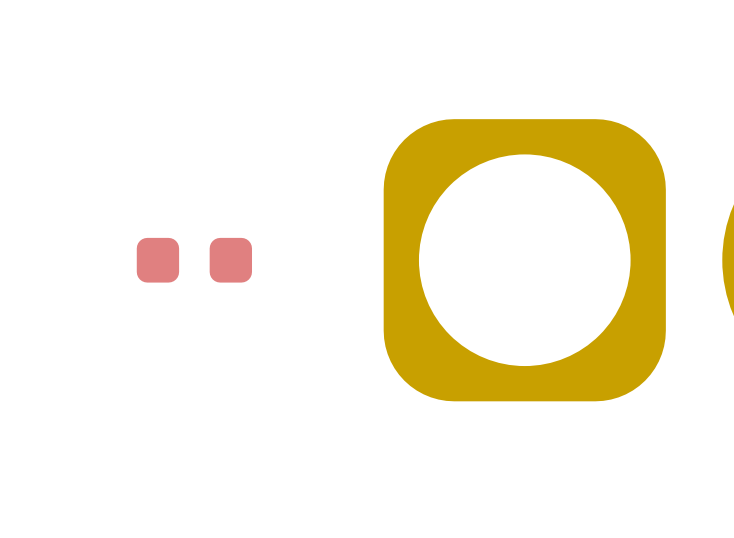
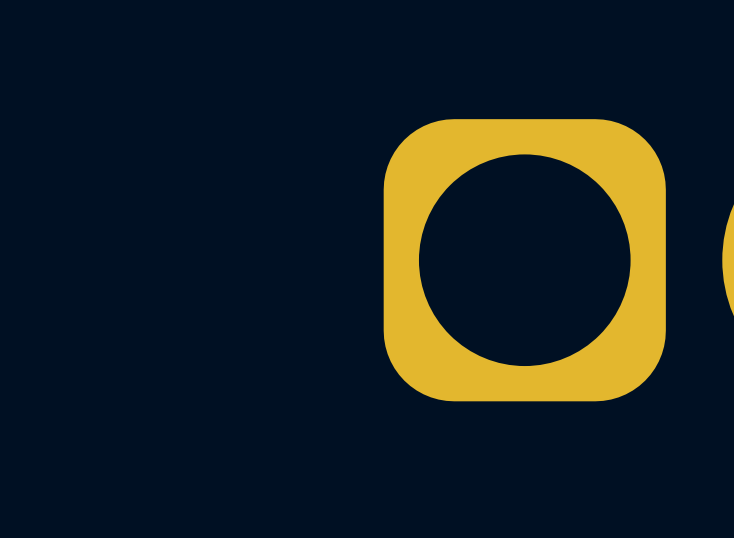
part: (194, 260) -> none

